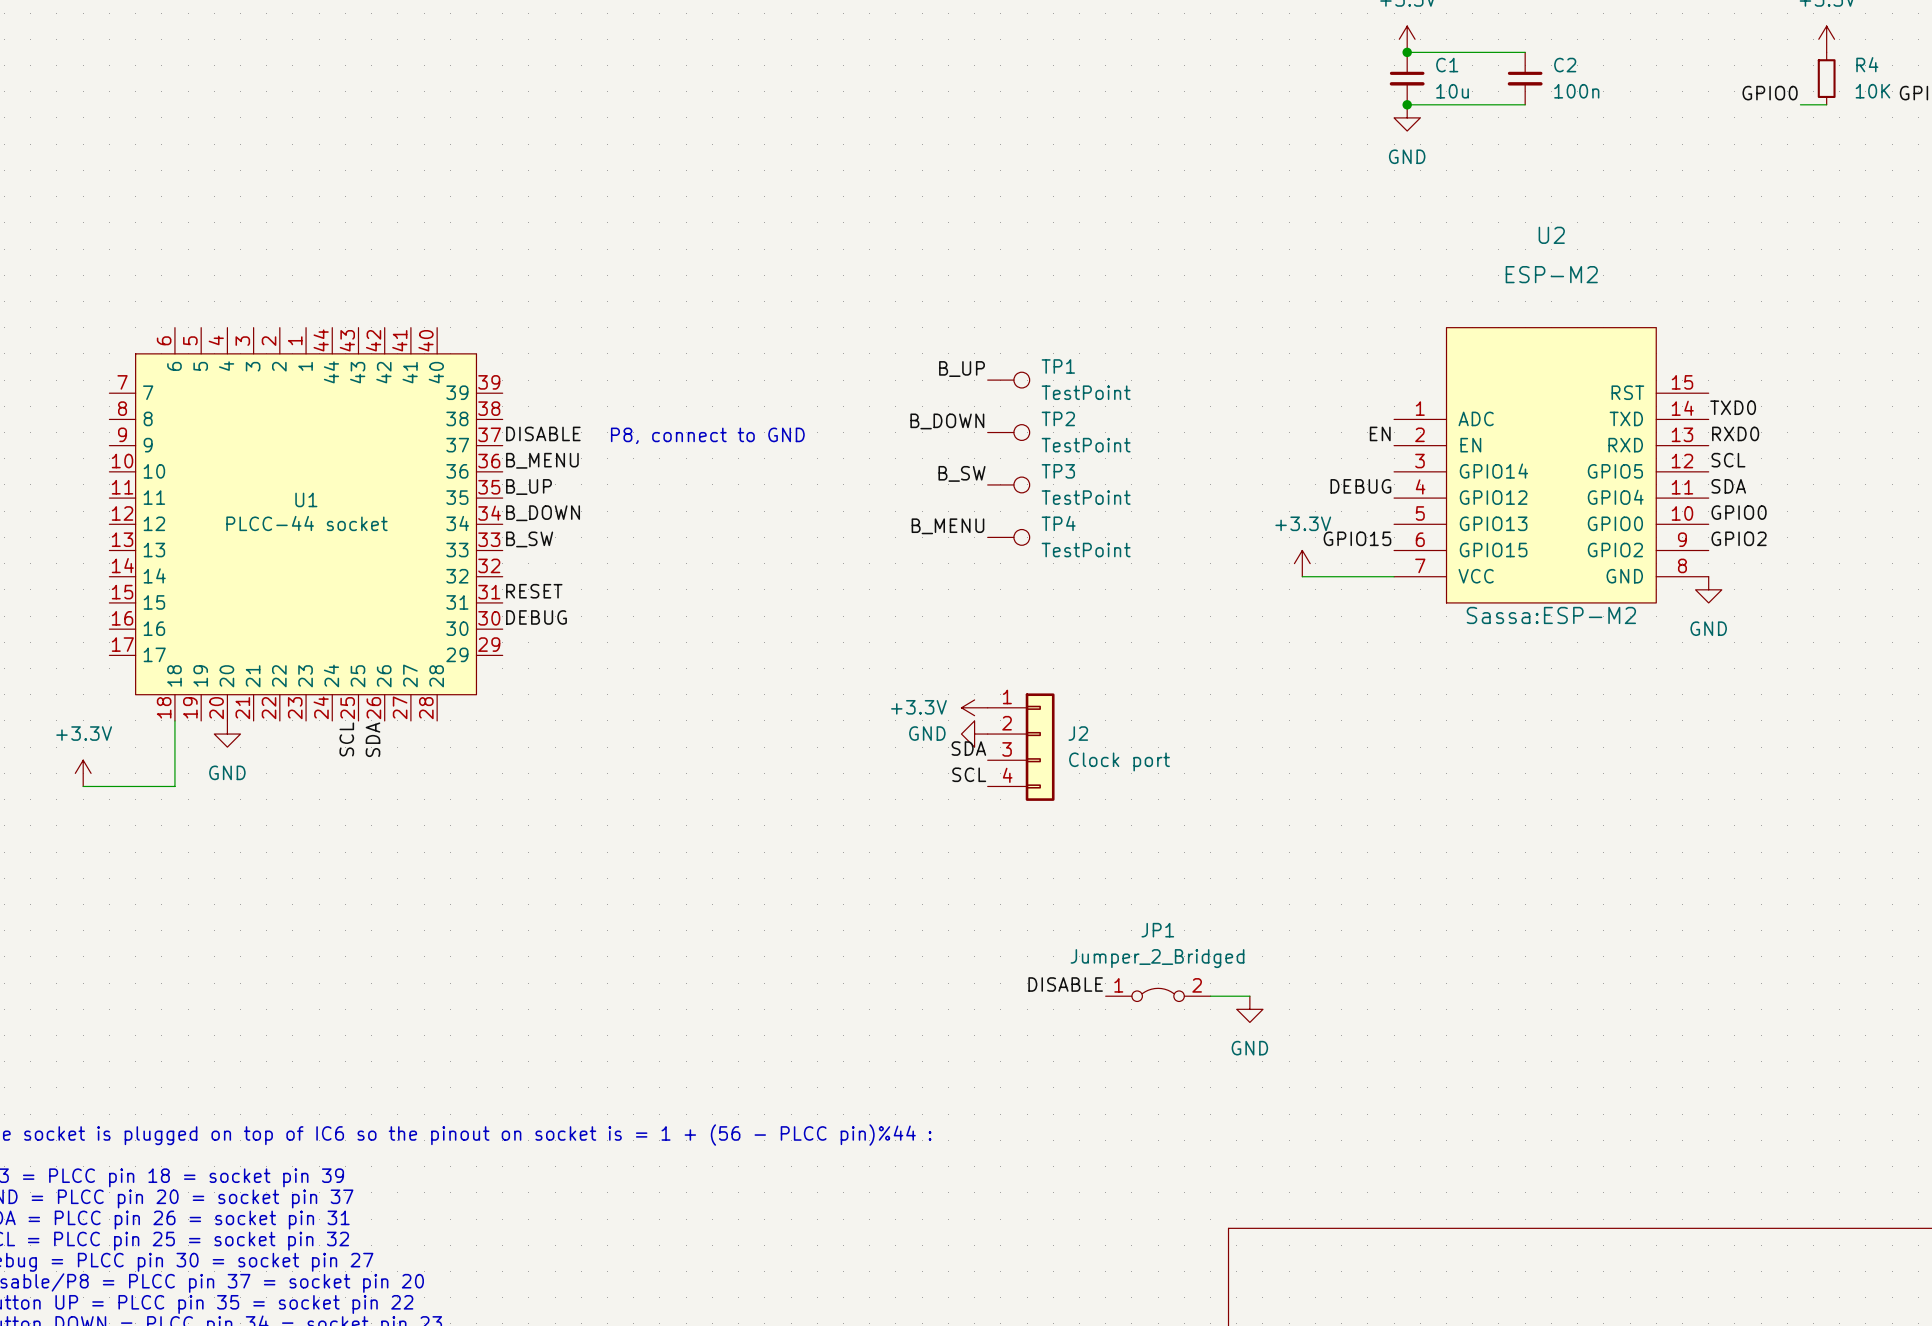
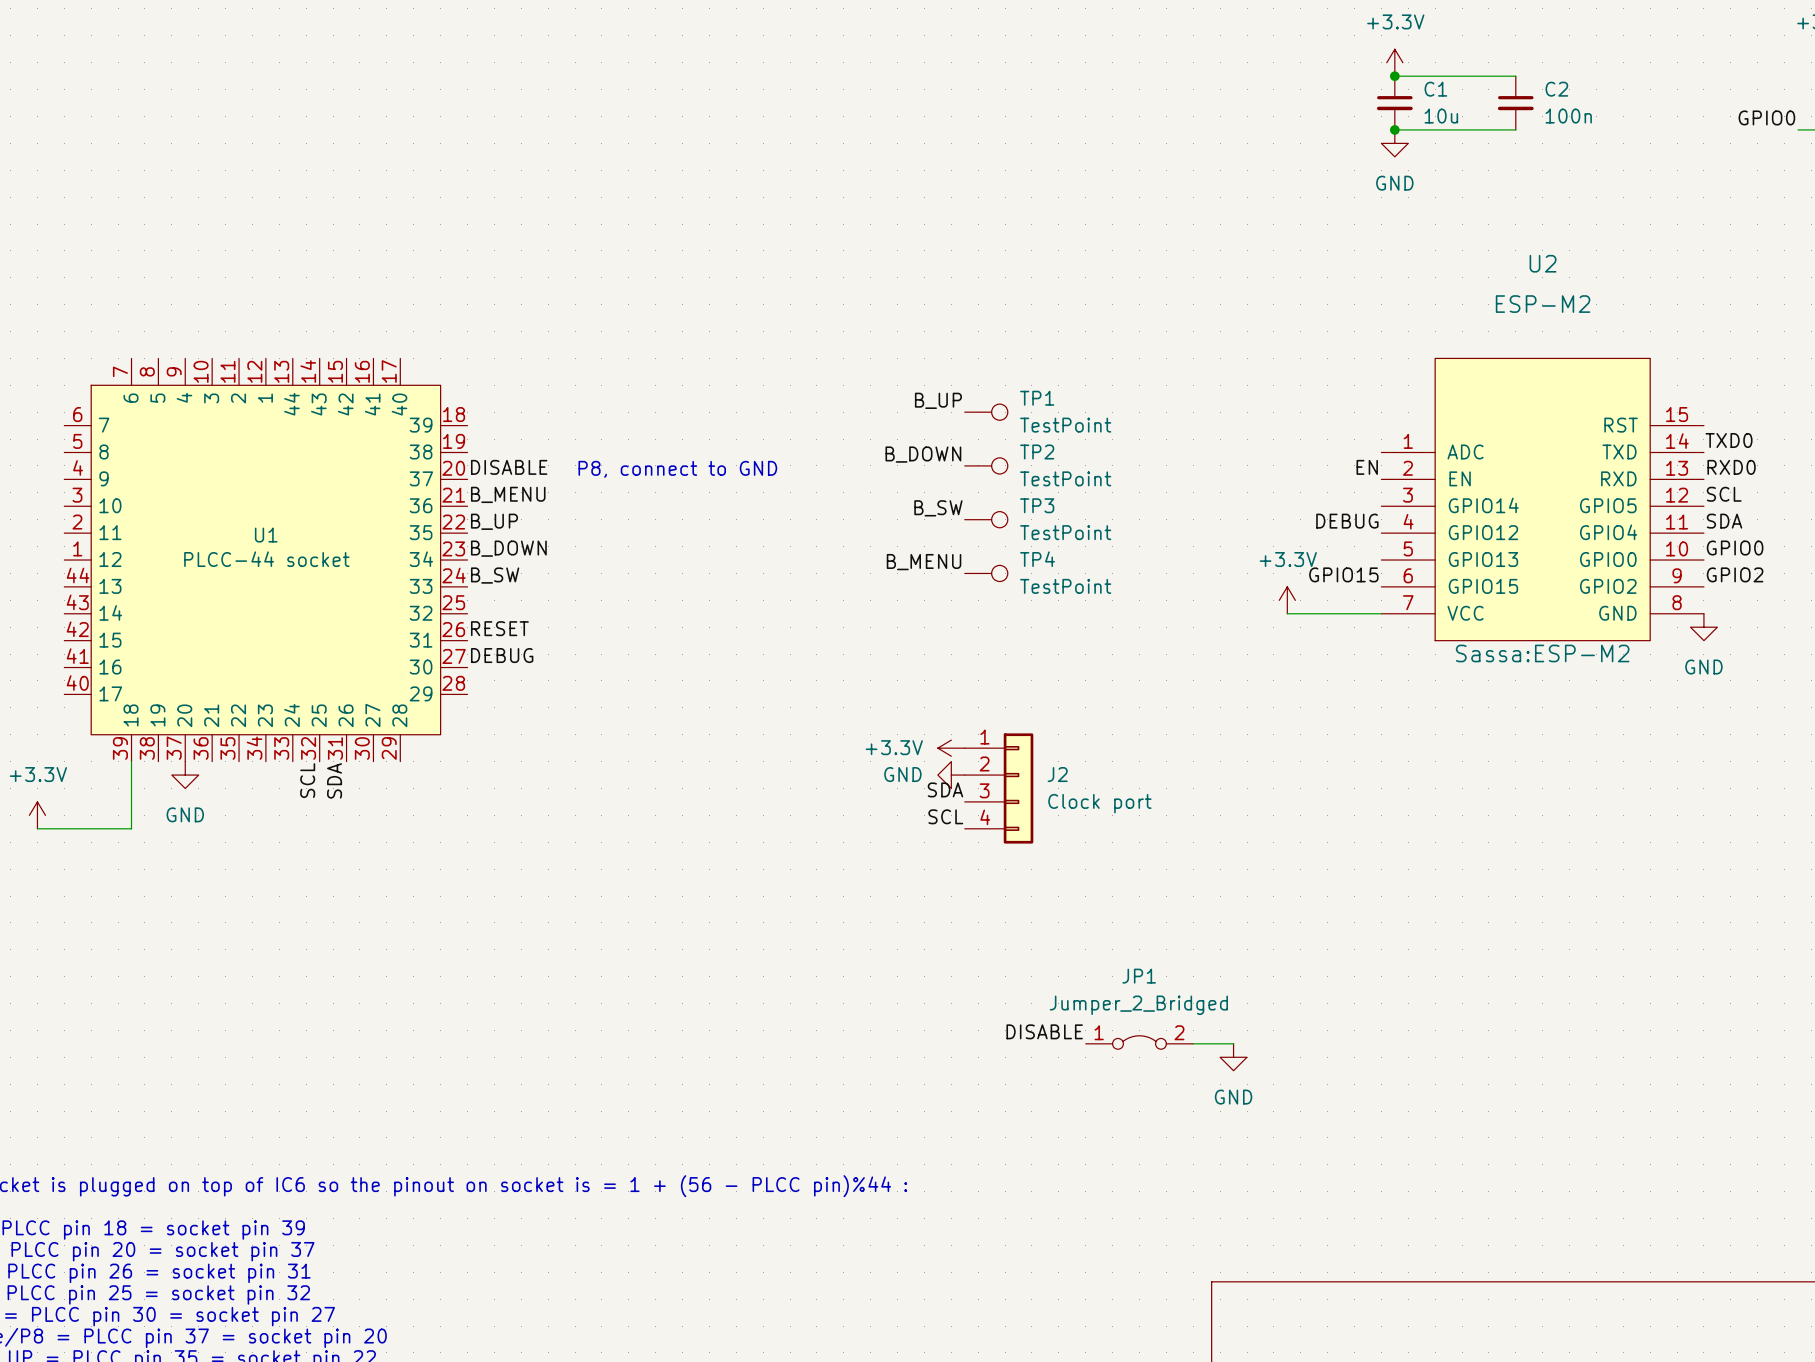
U1 symbol: [109, 327, 503, 721] -> [64, 358, 468, 762]

